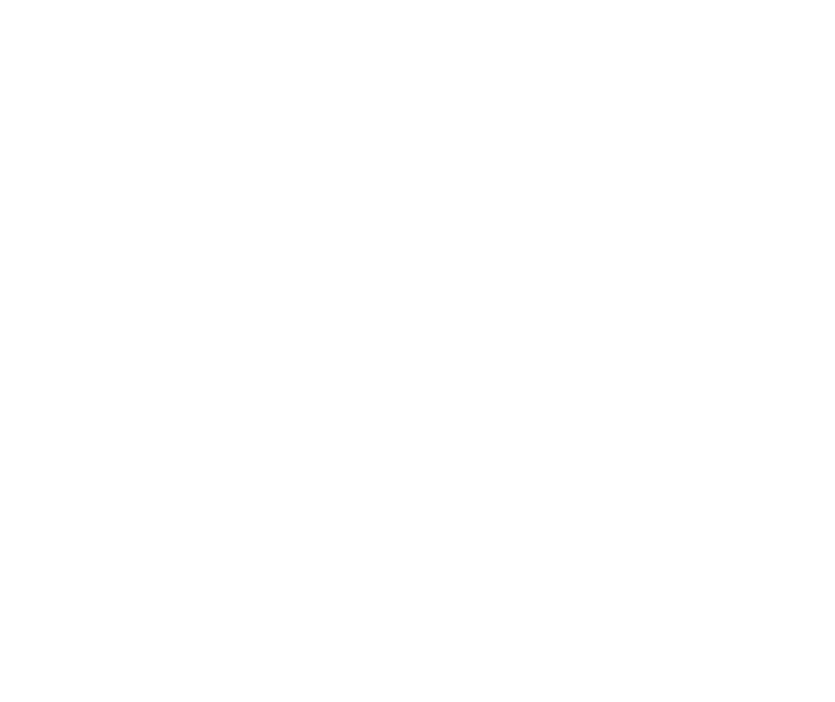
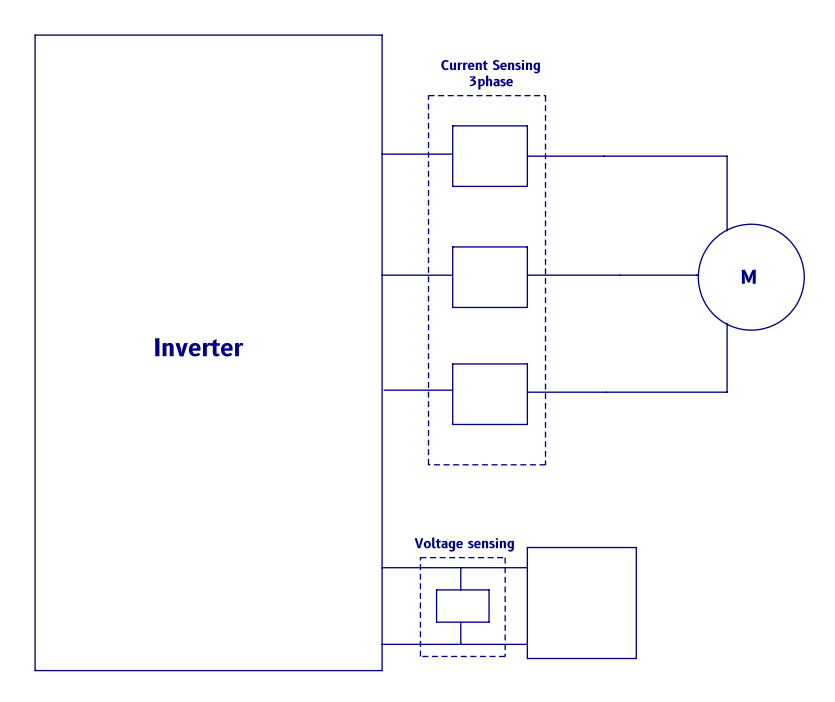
line: none -> (35, 35) (382, 35) (382, 670) (35, 670) (35, 35)
text: none -> Current Sensing (490, 66)
text: none -> 3phase (491, 82)
line: none -> (428, 95) (545, 95) (545, 464) (428, 464) (428, 95)
line: none -> (452, 125) (452, 186) (527, 186) (527, 125) (452, 125)
line: none -> (382, 154) (452, 154)
line: none -> (527, 156) (727, 156) (727, 230)
drawing: none -> [698, 224, 805, 331]
line: none -> (452, 246) (527, 246) (527, 307) (452, 307) (452, 246)
line: none -> (382, 275) (452, 275)
line: none -> (527, 275) (698, 275)
text: none -> M (748, 276)
line: none -> (727, 323) (727, 392) (527, 392)
text: none -> Inverter (198, 347)
line: none -> (452, 363) (452, 424) (527, 424) (527, 363) (452, 363)
line: none -> (384, 390) (452, 390)
text: none -> Voltage sensing (464, 544)
line: none -> (527, 547) (636, 547) (636, 658) (527, 658) (527, 547)
line: none -> (420, 557) (505, 557) (505, 656) (420, 656) (420, 557)
line: none -> (382, 567) (527, 567)
line: none -> (460, 567) (460, 589)
line: none -> (436, 589) (489, 589) (489, 622) (436, 622) (436, 589)
line: none -> (460, 622) (460, 644)
line: none -> (382, 644) (527, 644)

